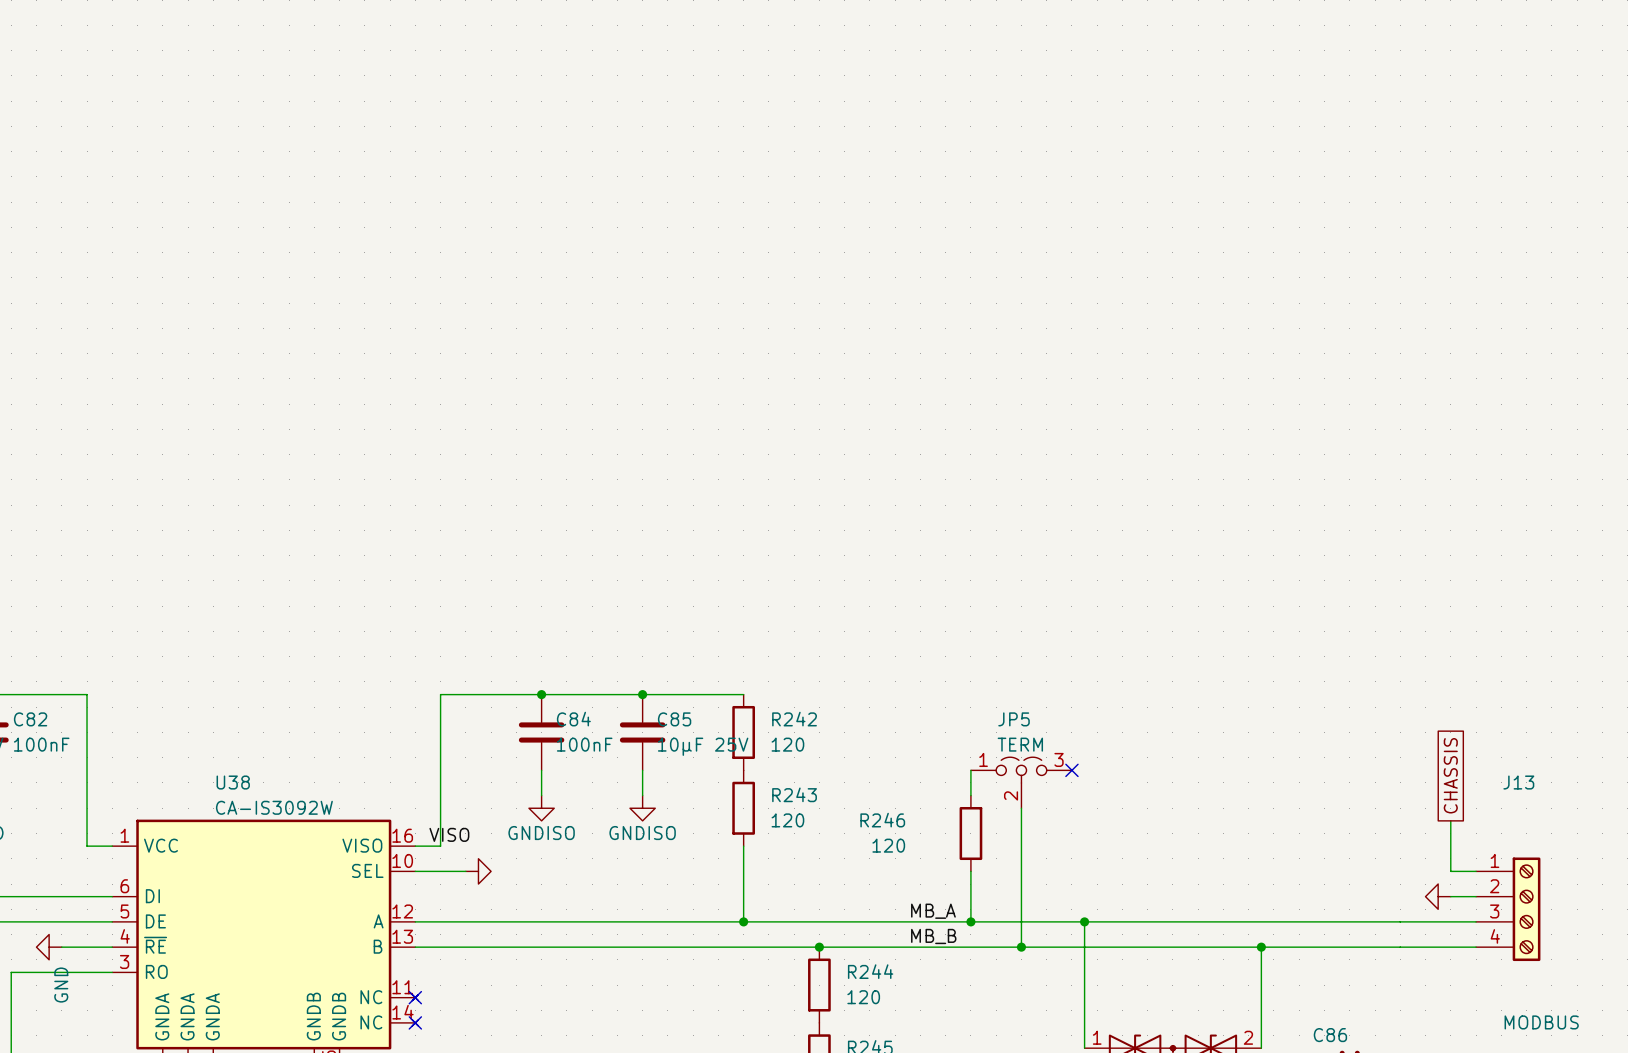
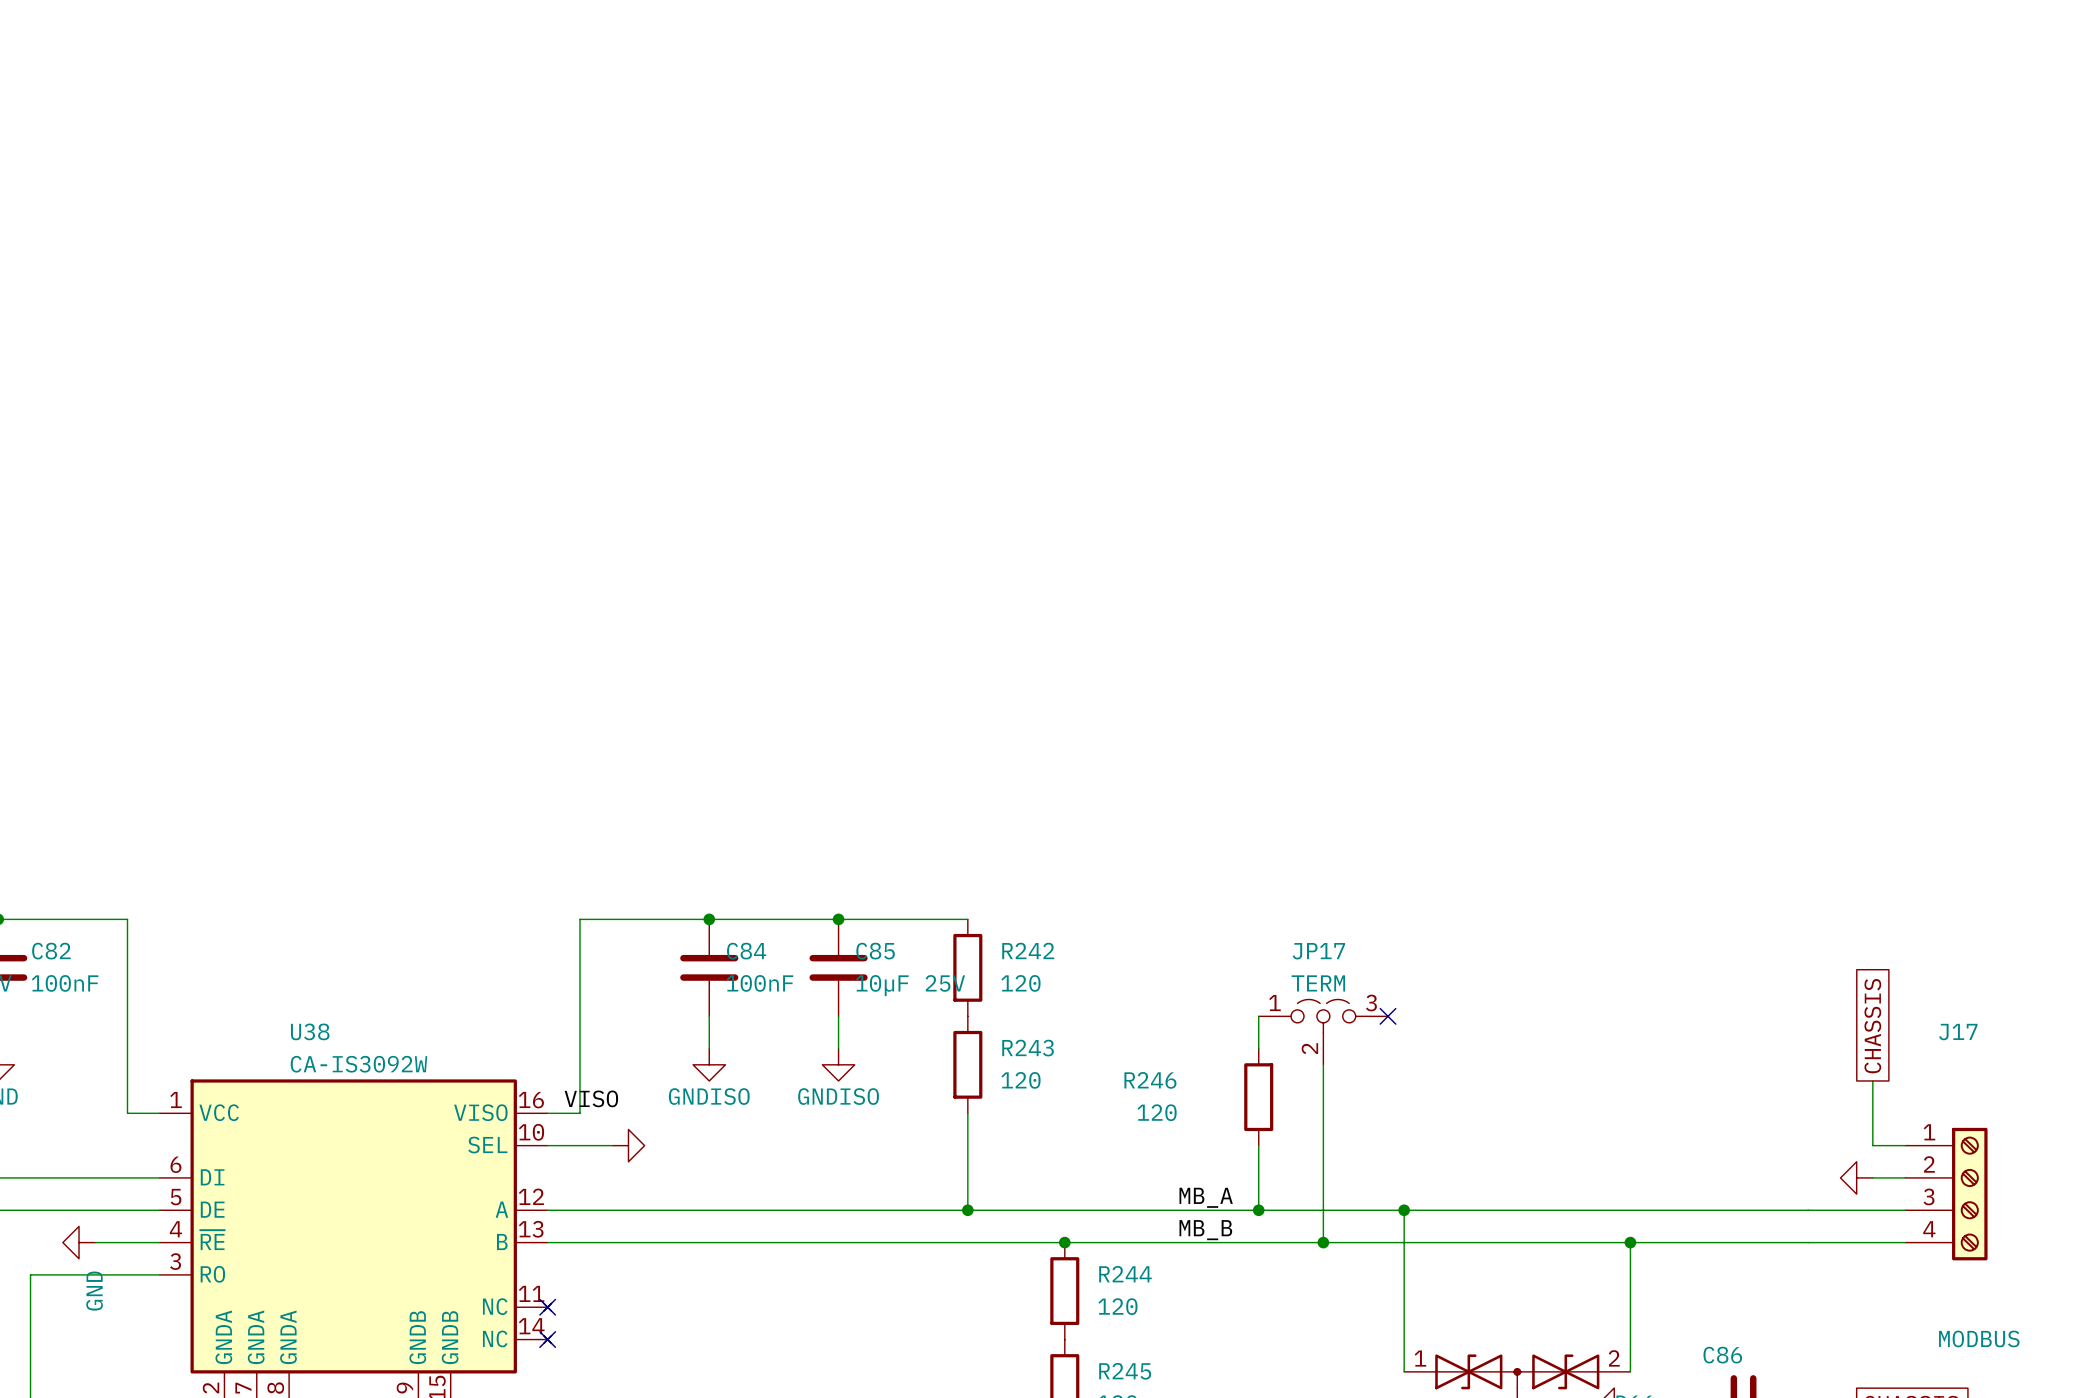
JP5 name: JP5 (1014, 719) -> JP17 (1318, 951)
J13 name: J13 (1518, 782) -> J17 (1958, 1032)

